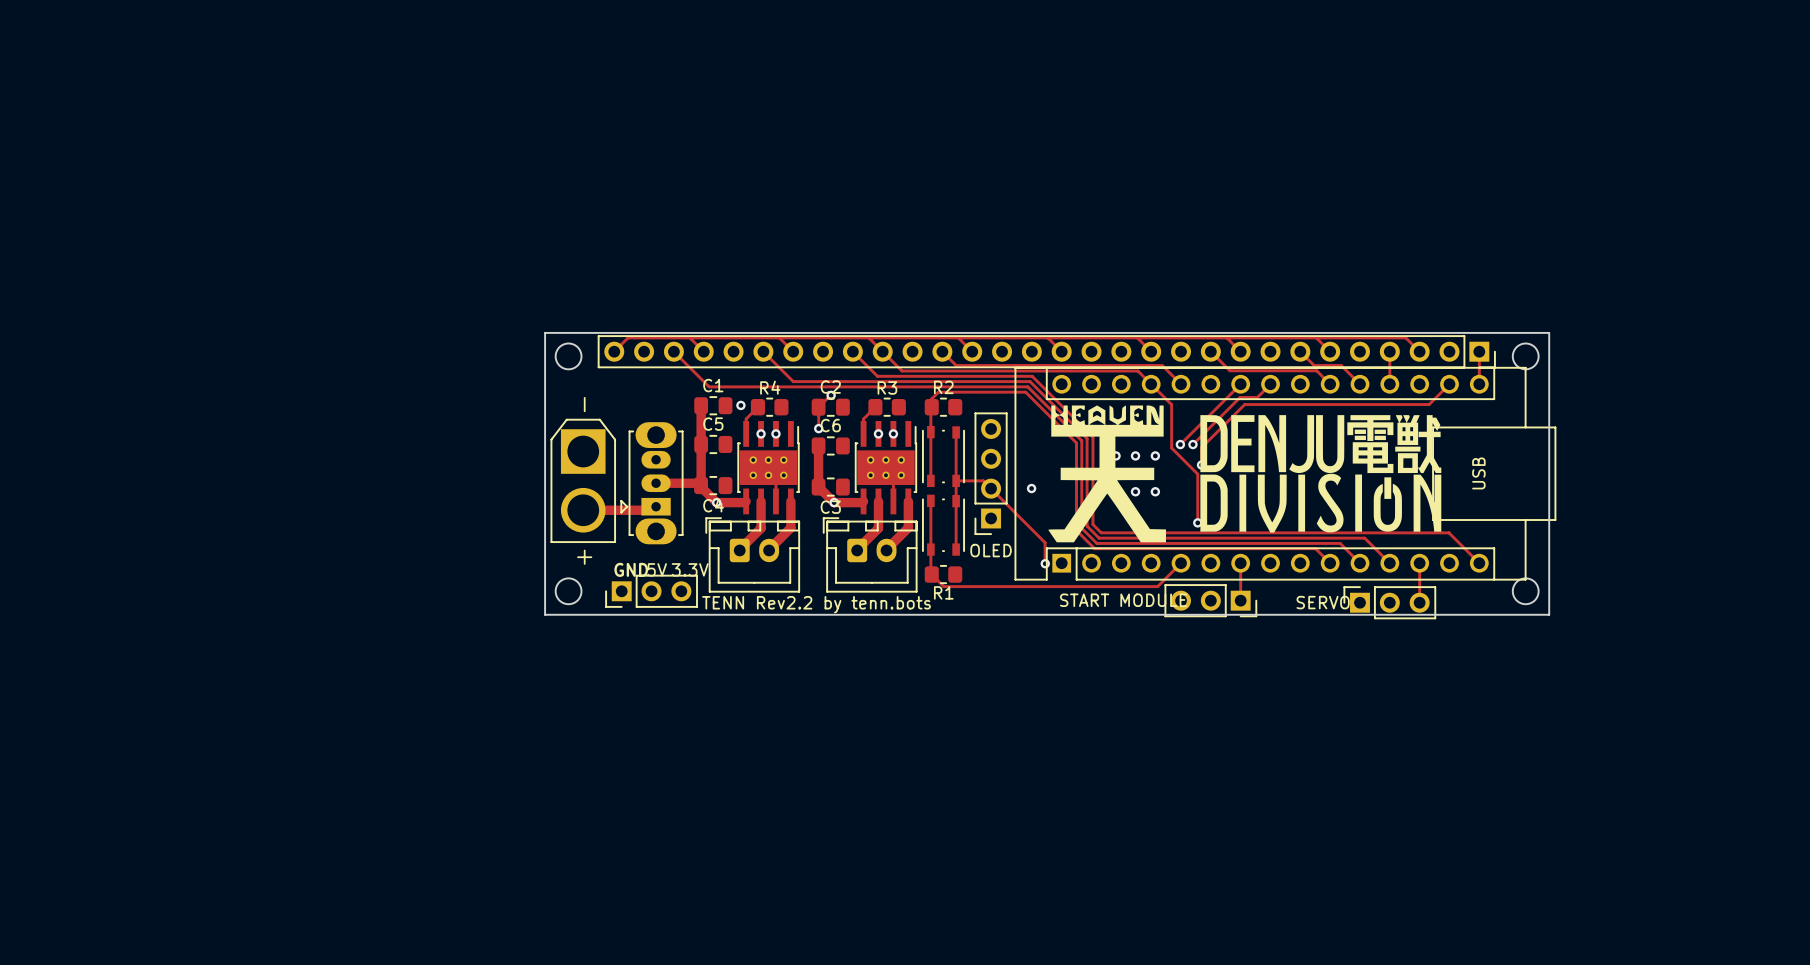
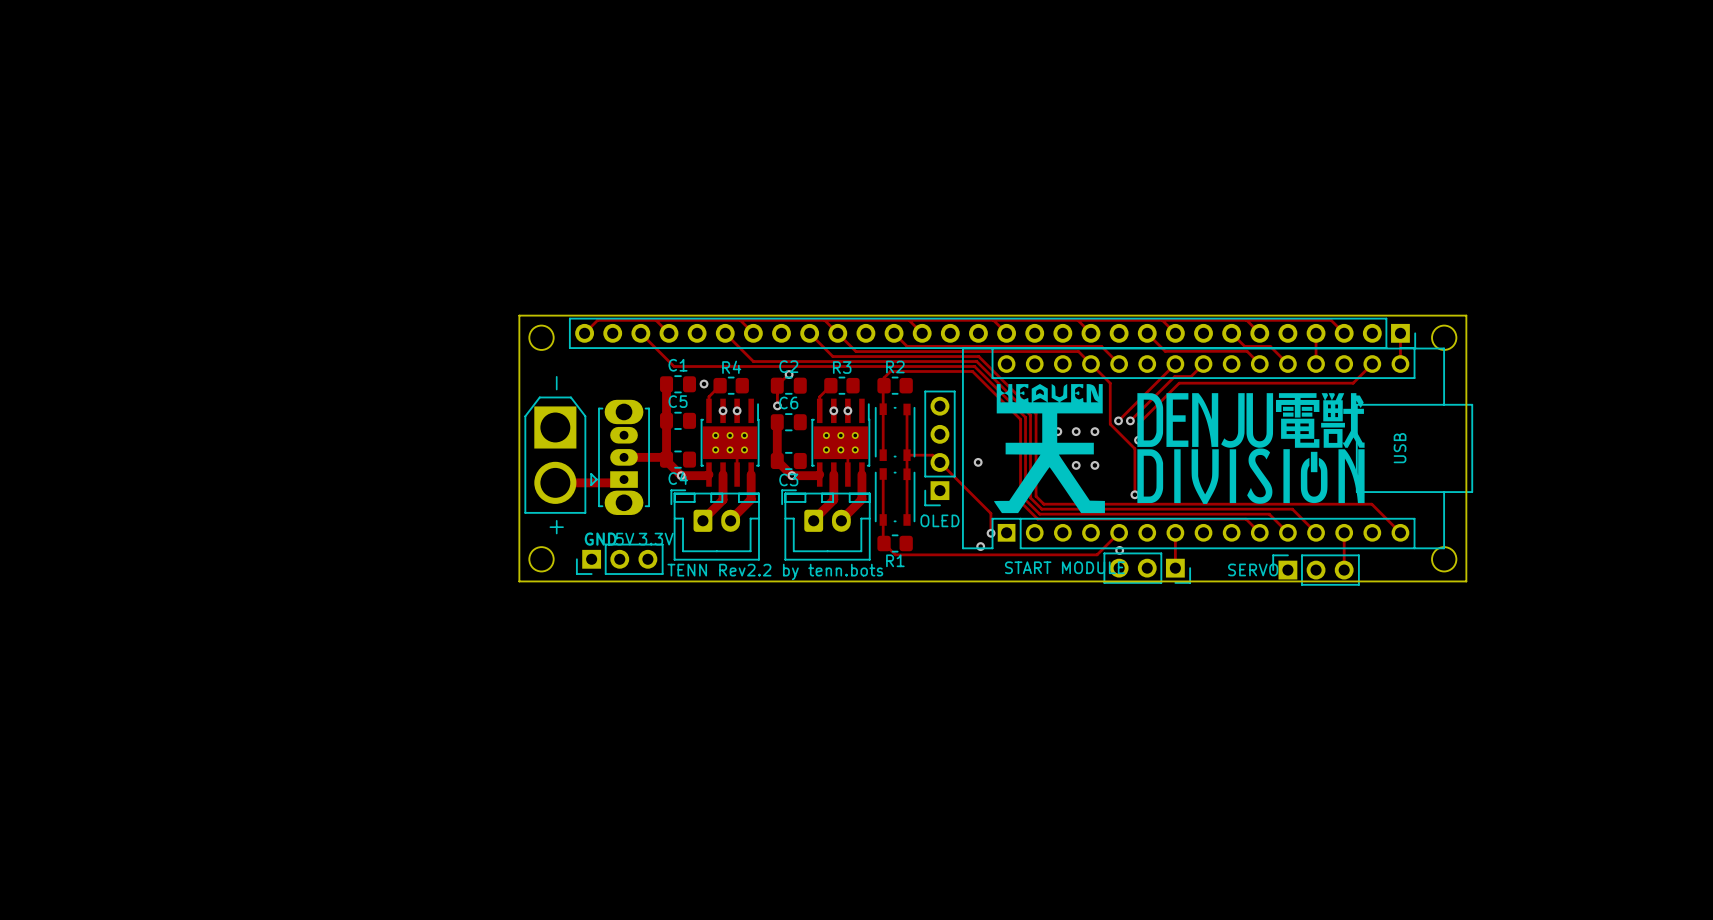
via: none -> (980, 546)
via: none -> (1119, 550)

